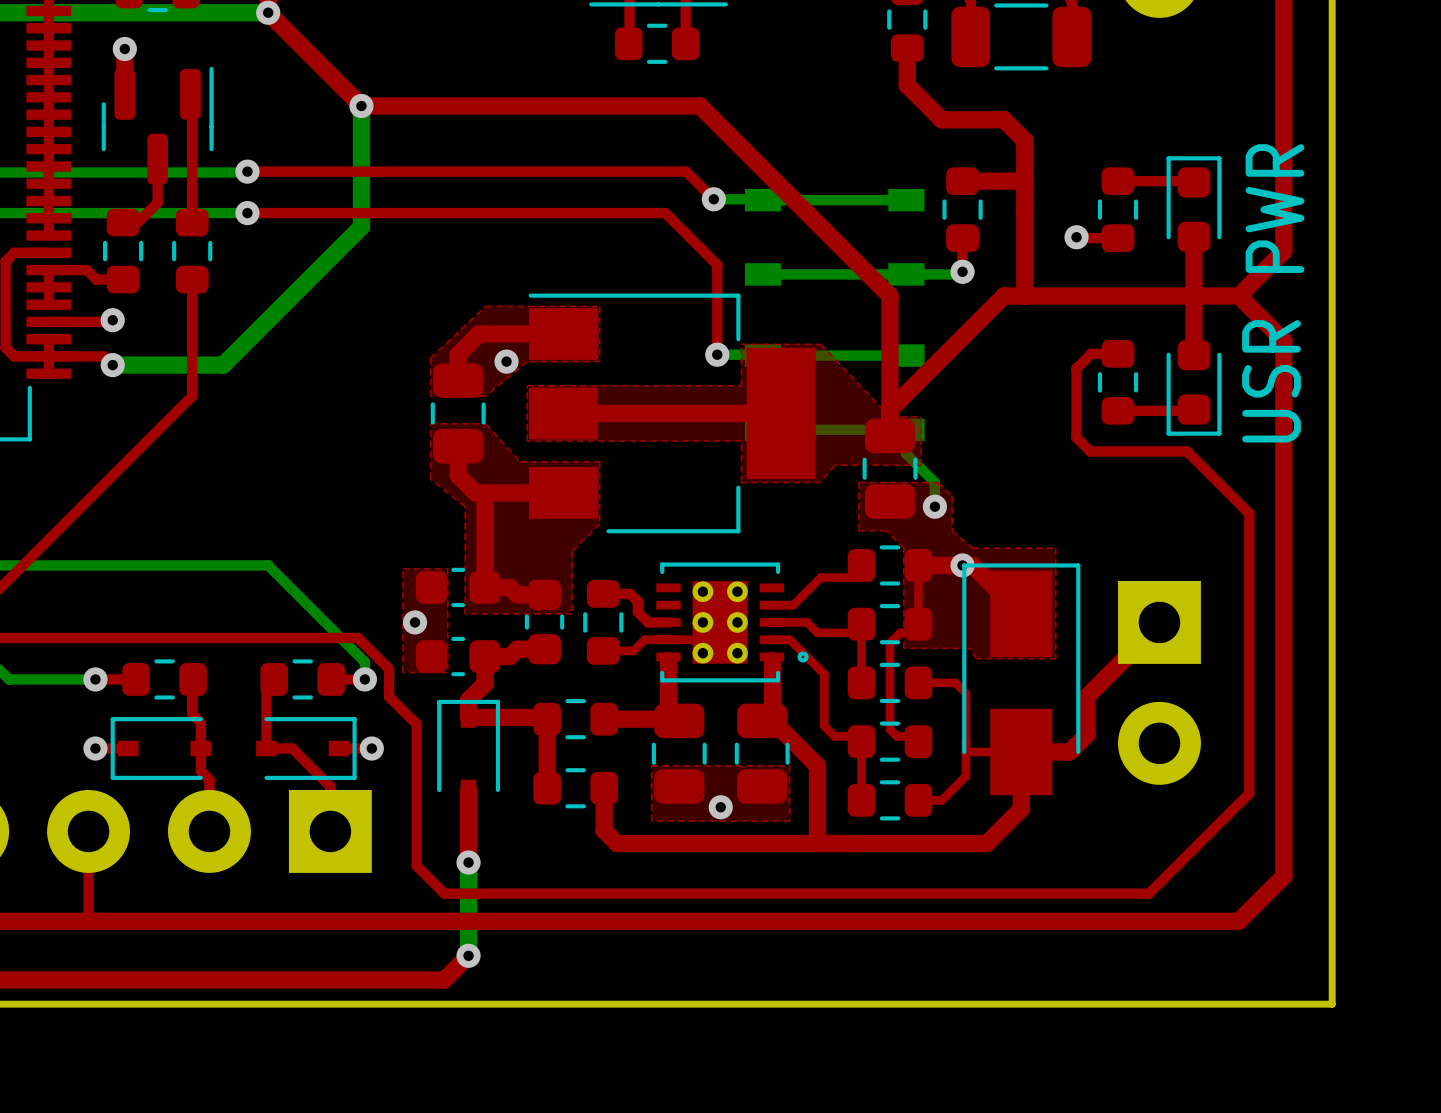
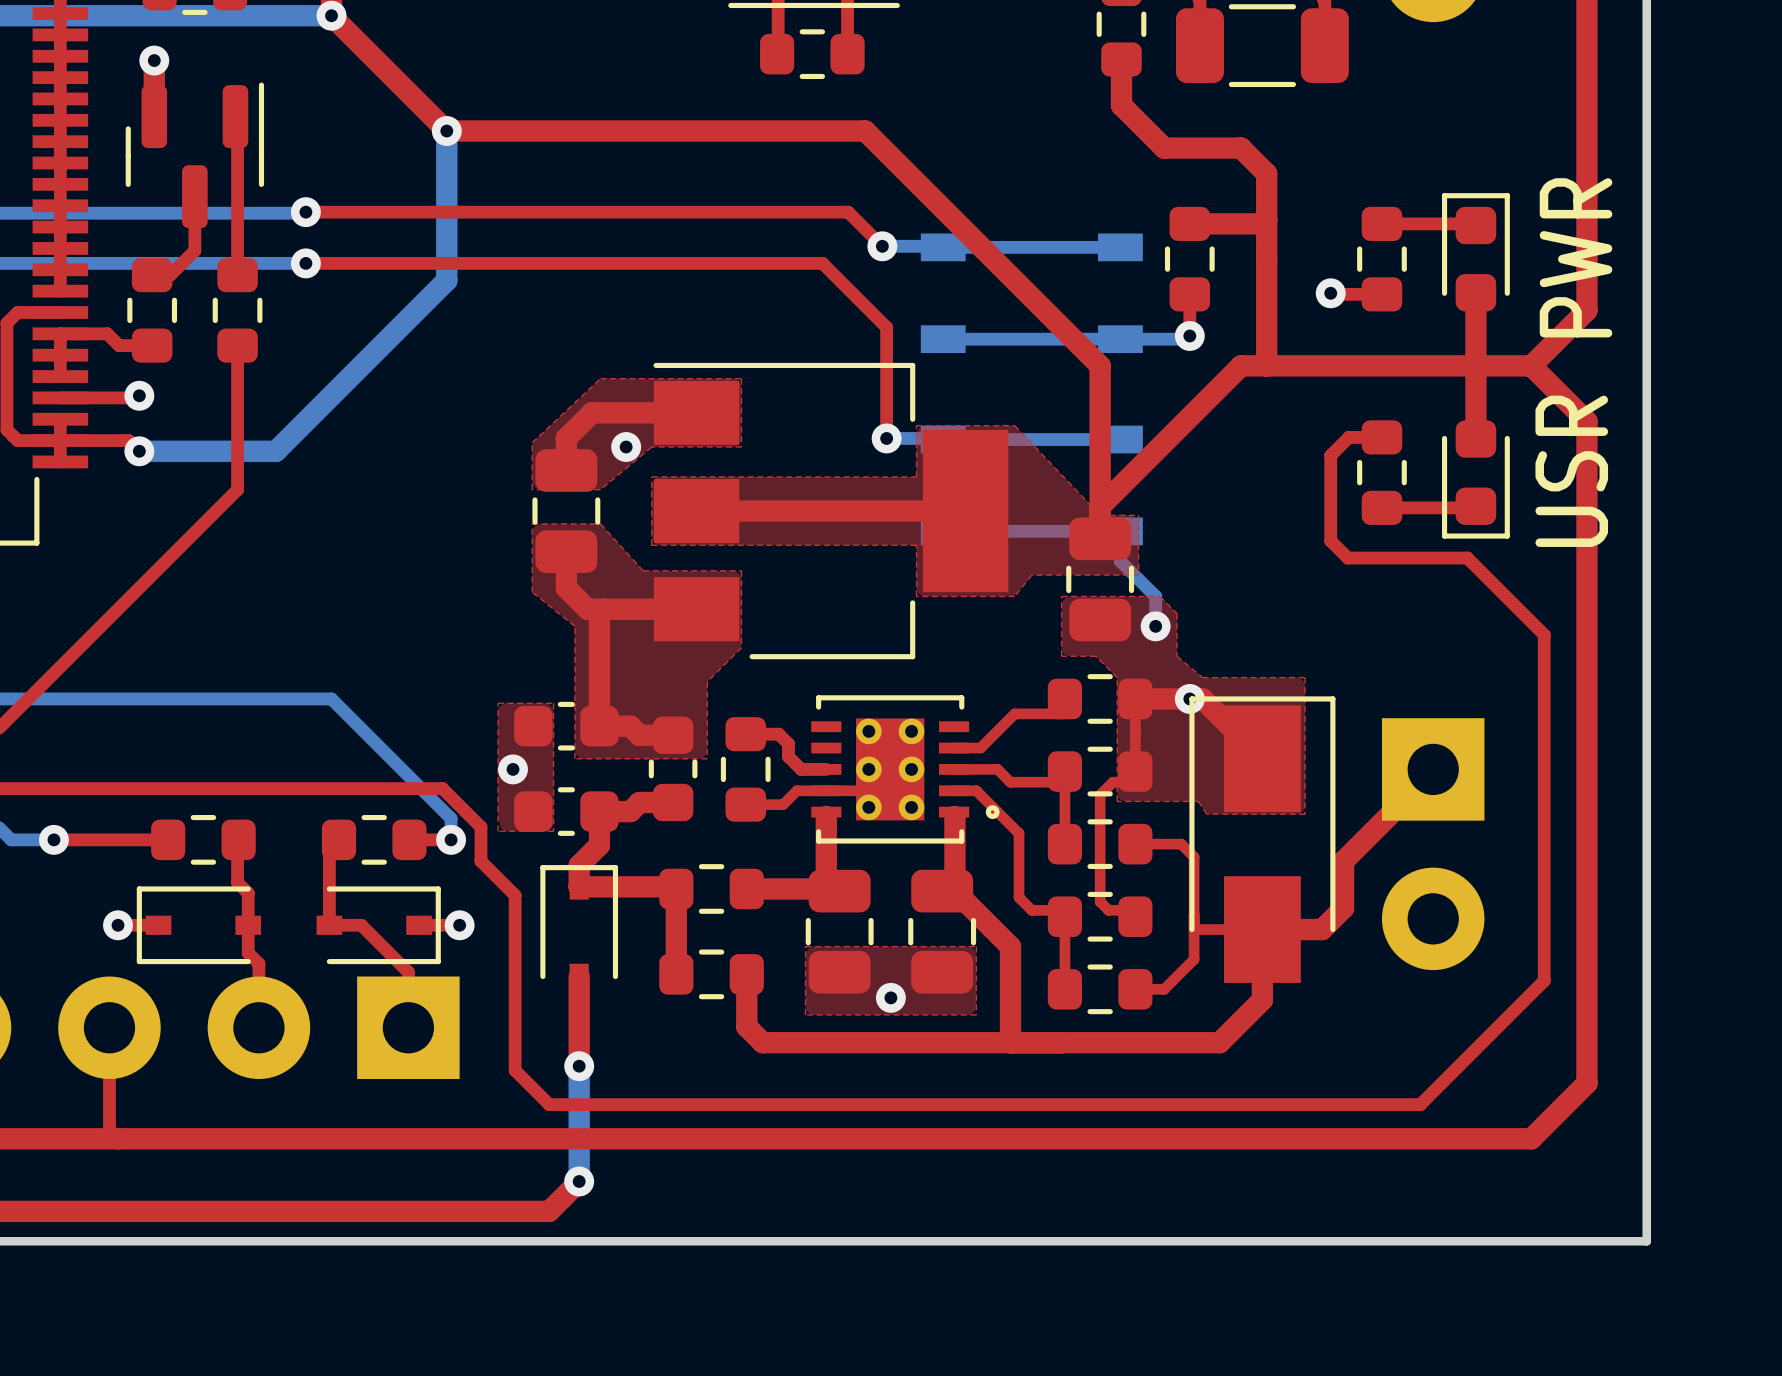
top track: none -> (53, 839) (118, 839)
bottom track: (43, 679) (95, 679) -> none
via position: (95, 679) -> (53, 839)

